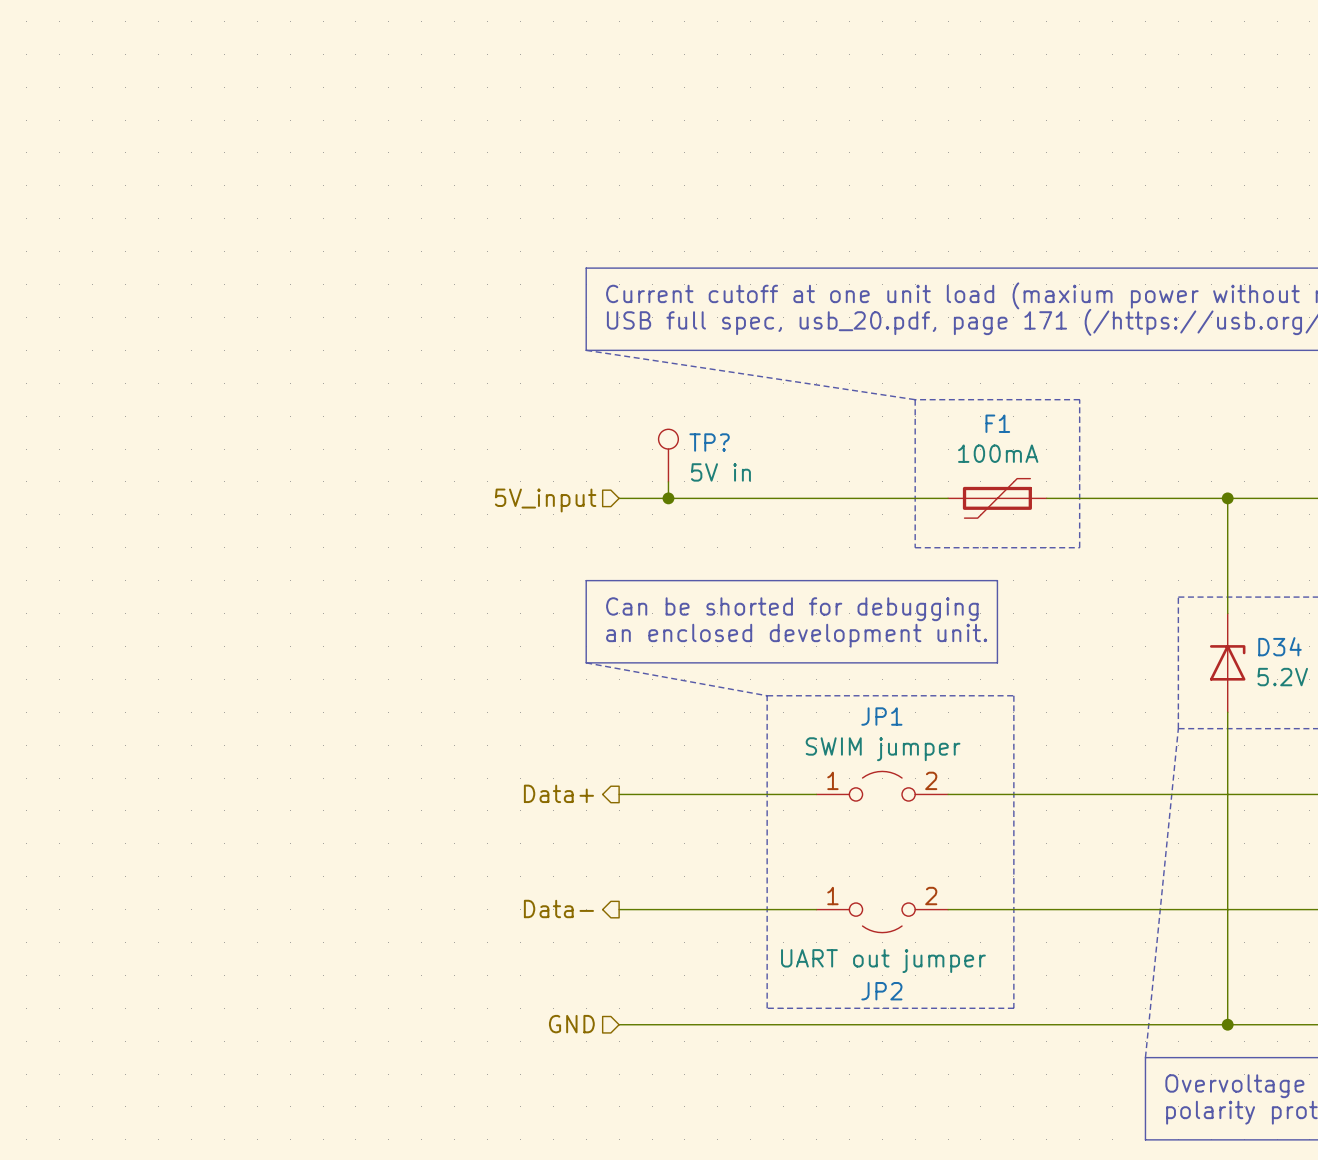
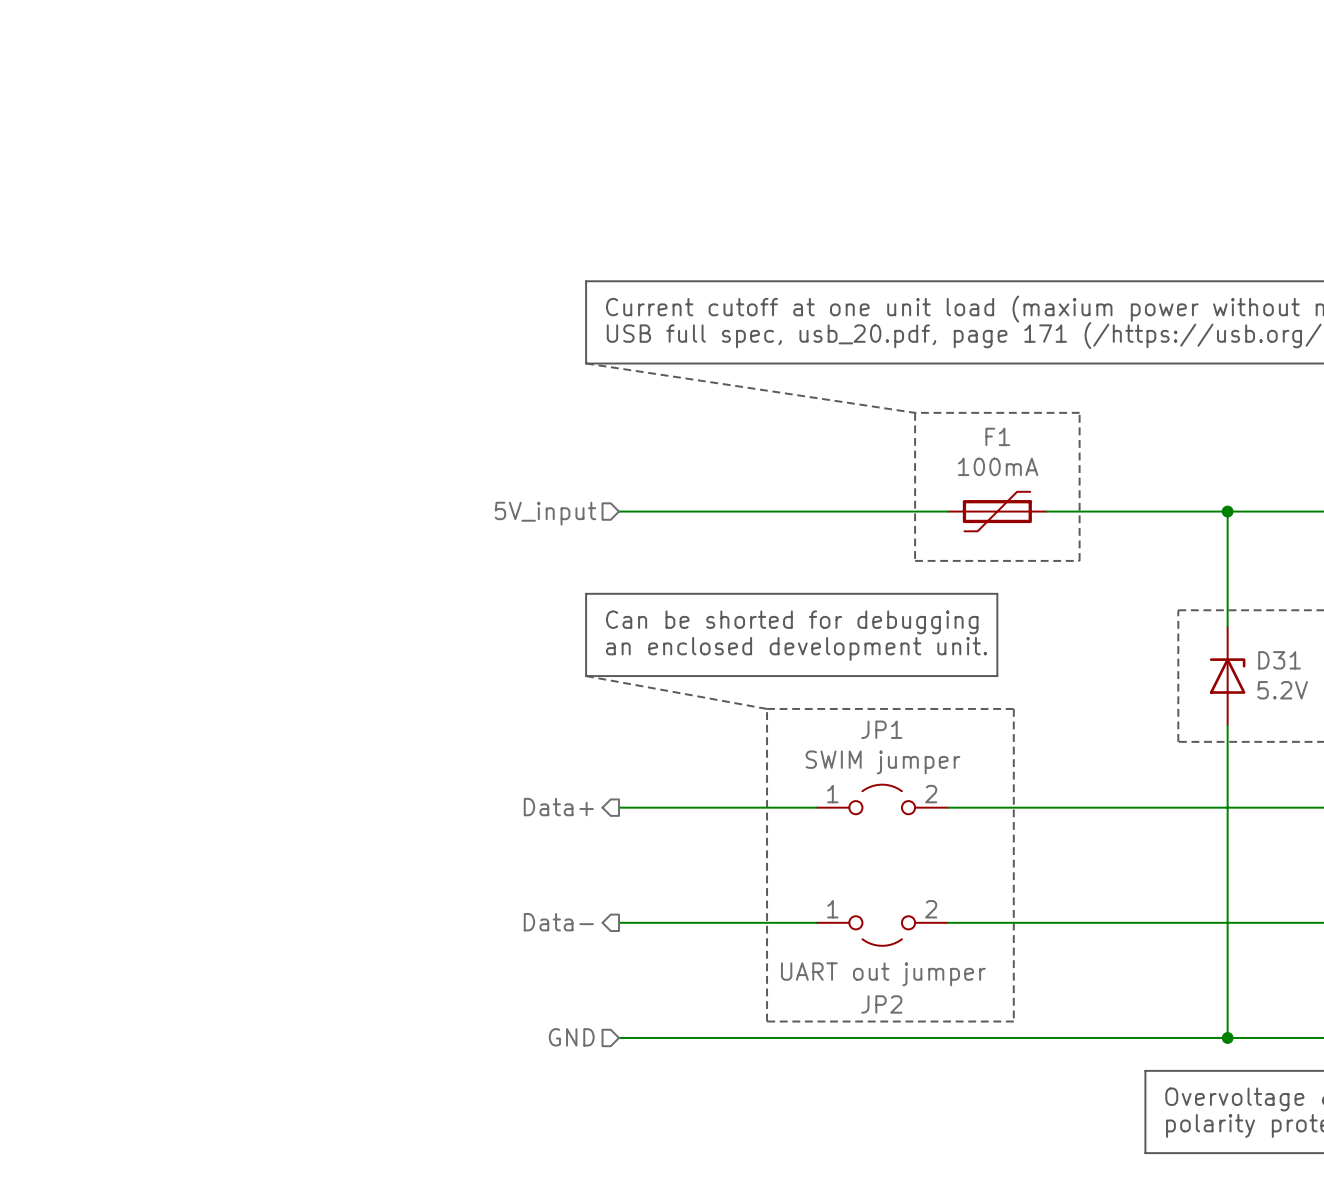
TP?: 5V in (668, 455) -> none
wire: (668, 481) (668, 498) -> none
junction: (668, 498) -> none
D34 name: D34 (1279, 646) -> D31 (1279, 660)
line: (1178, 728) (1145, 1057) -> none

